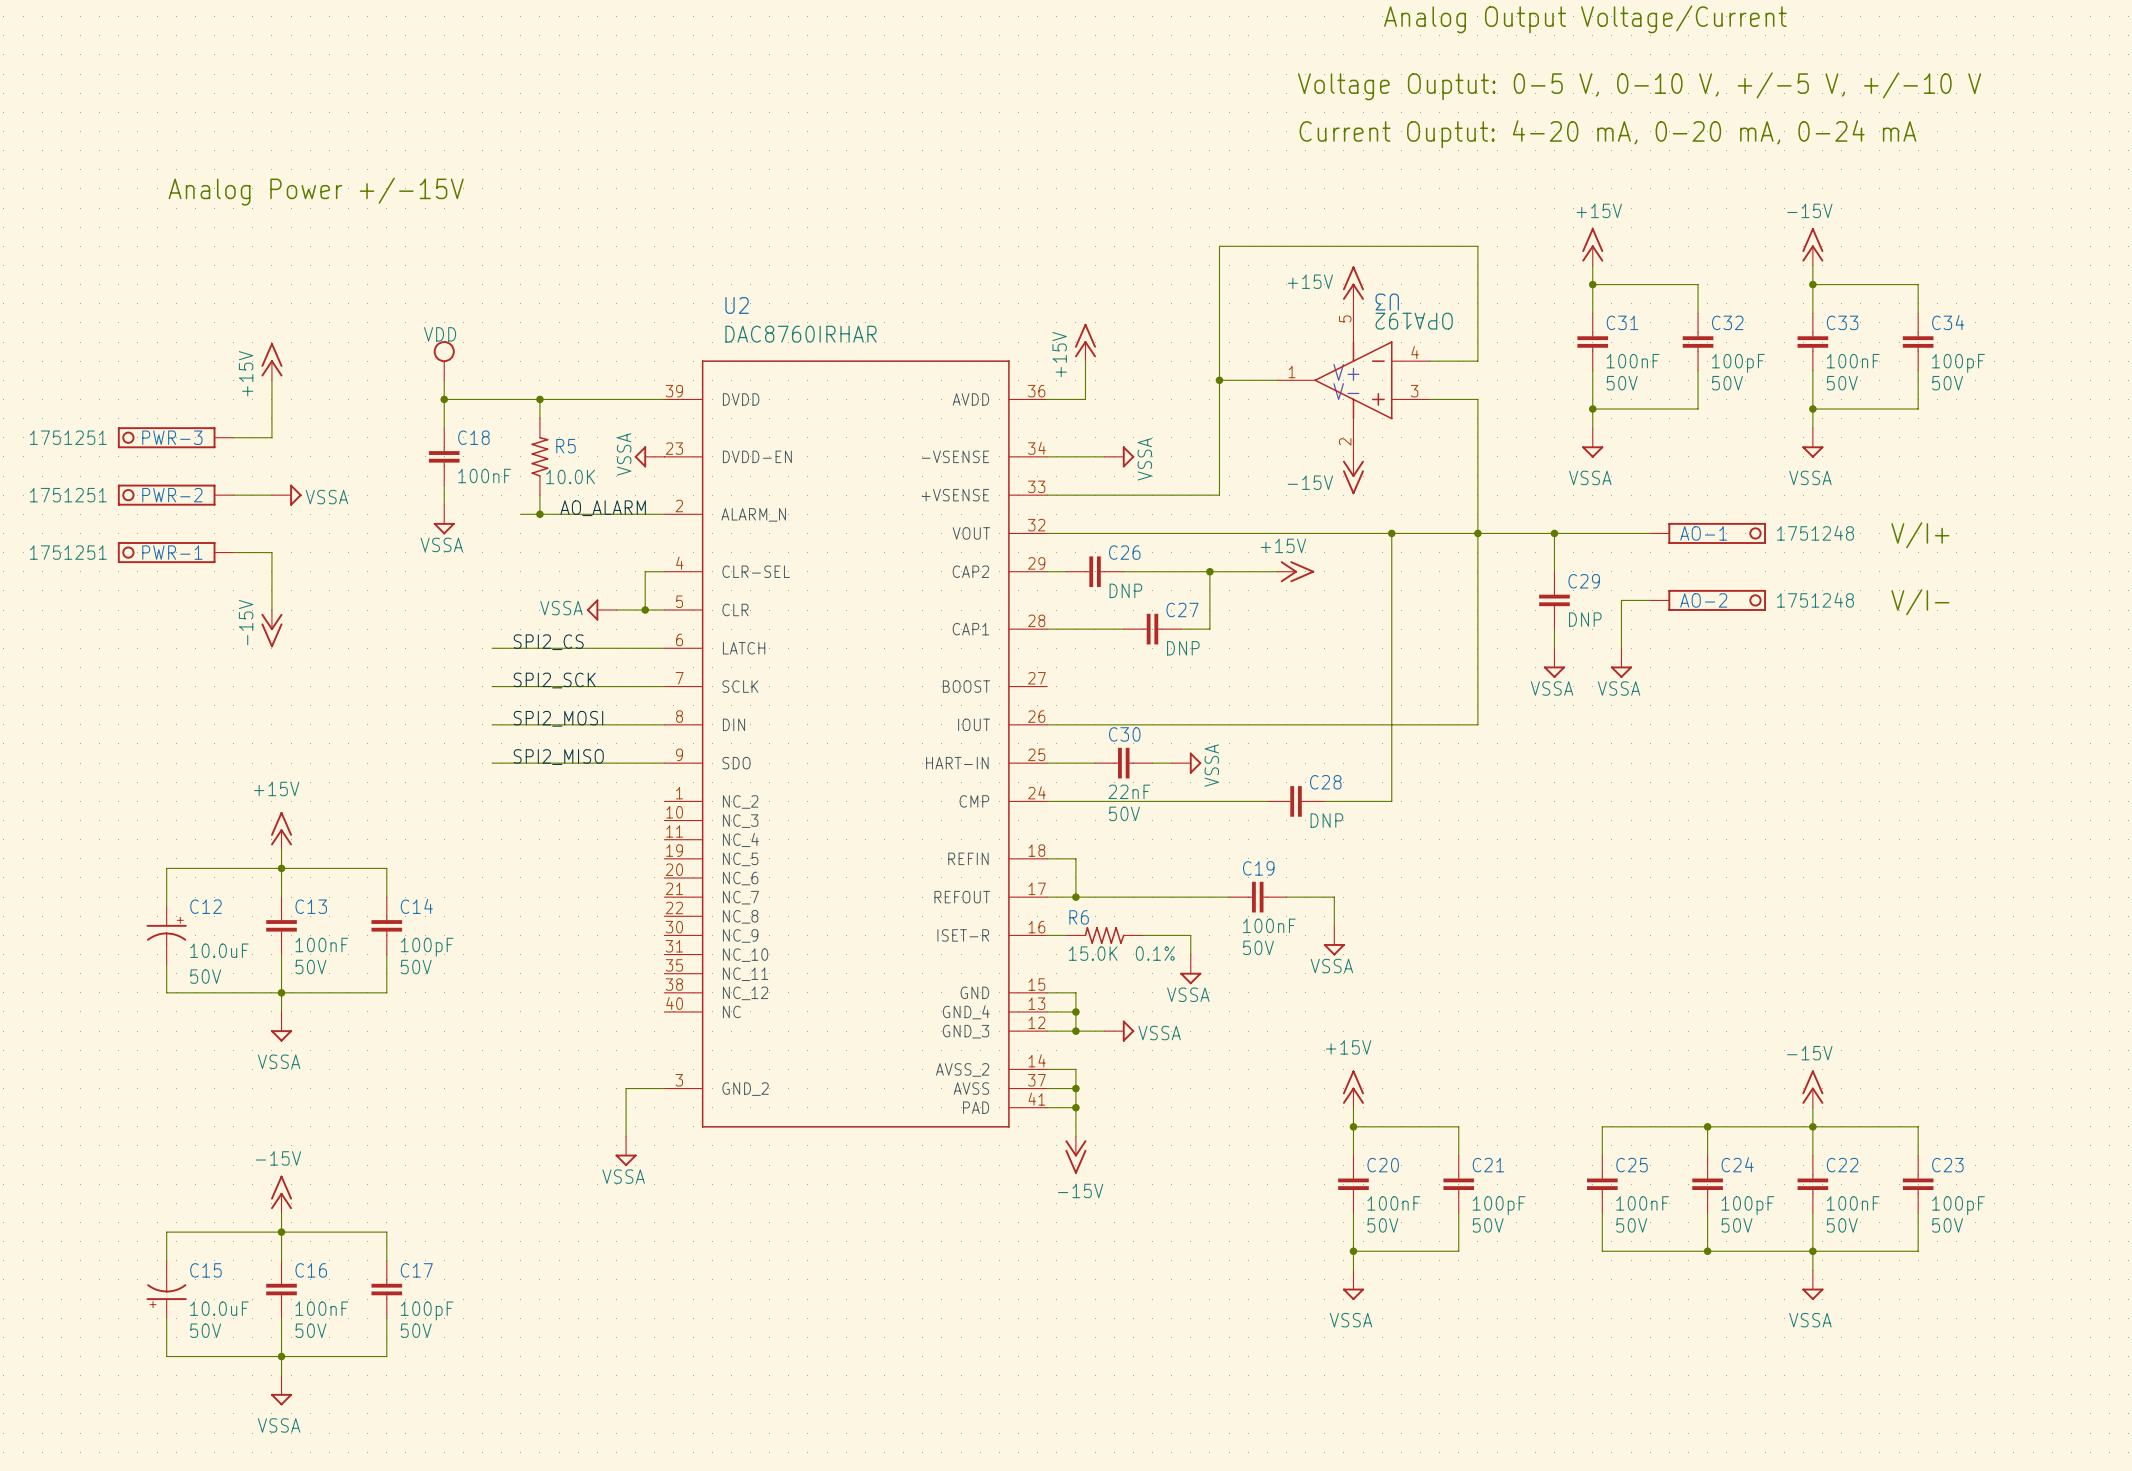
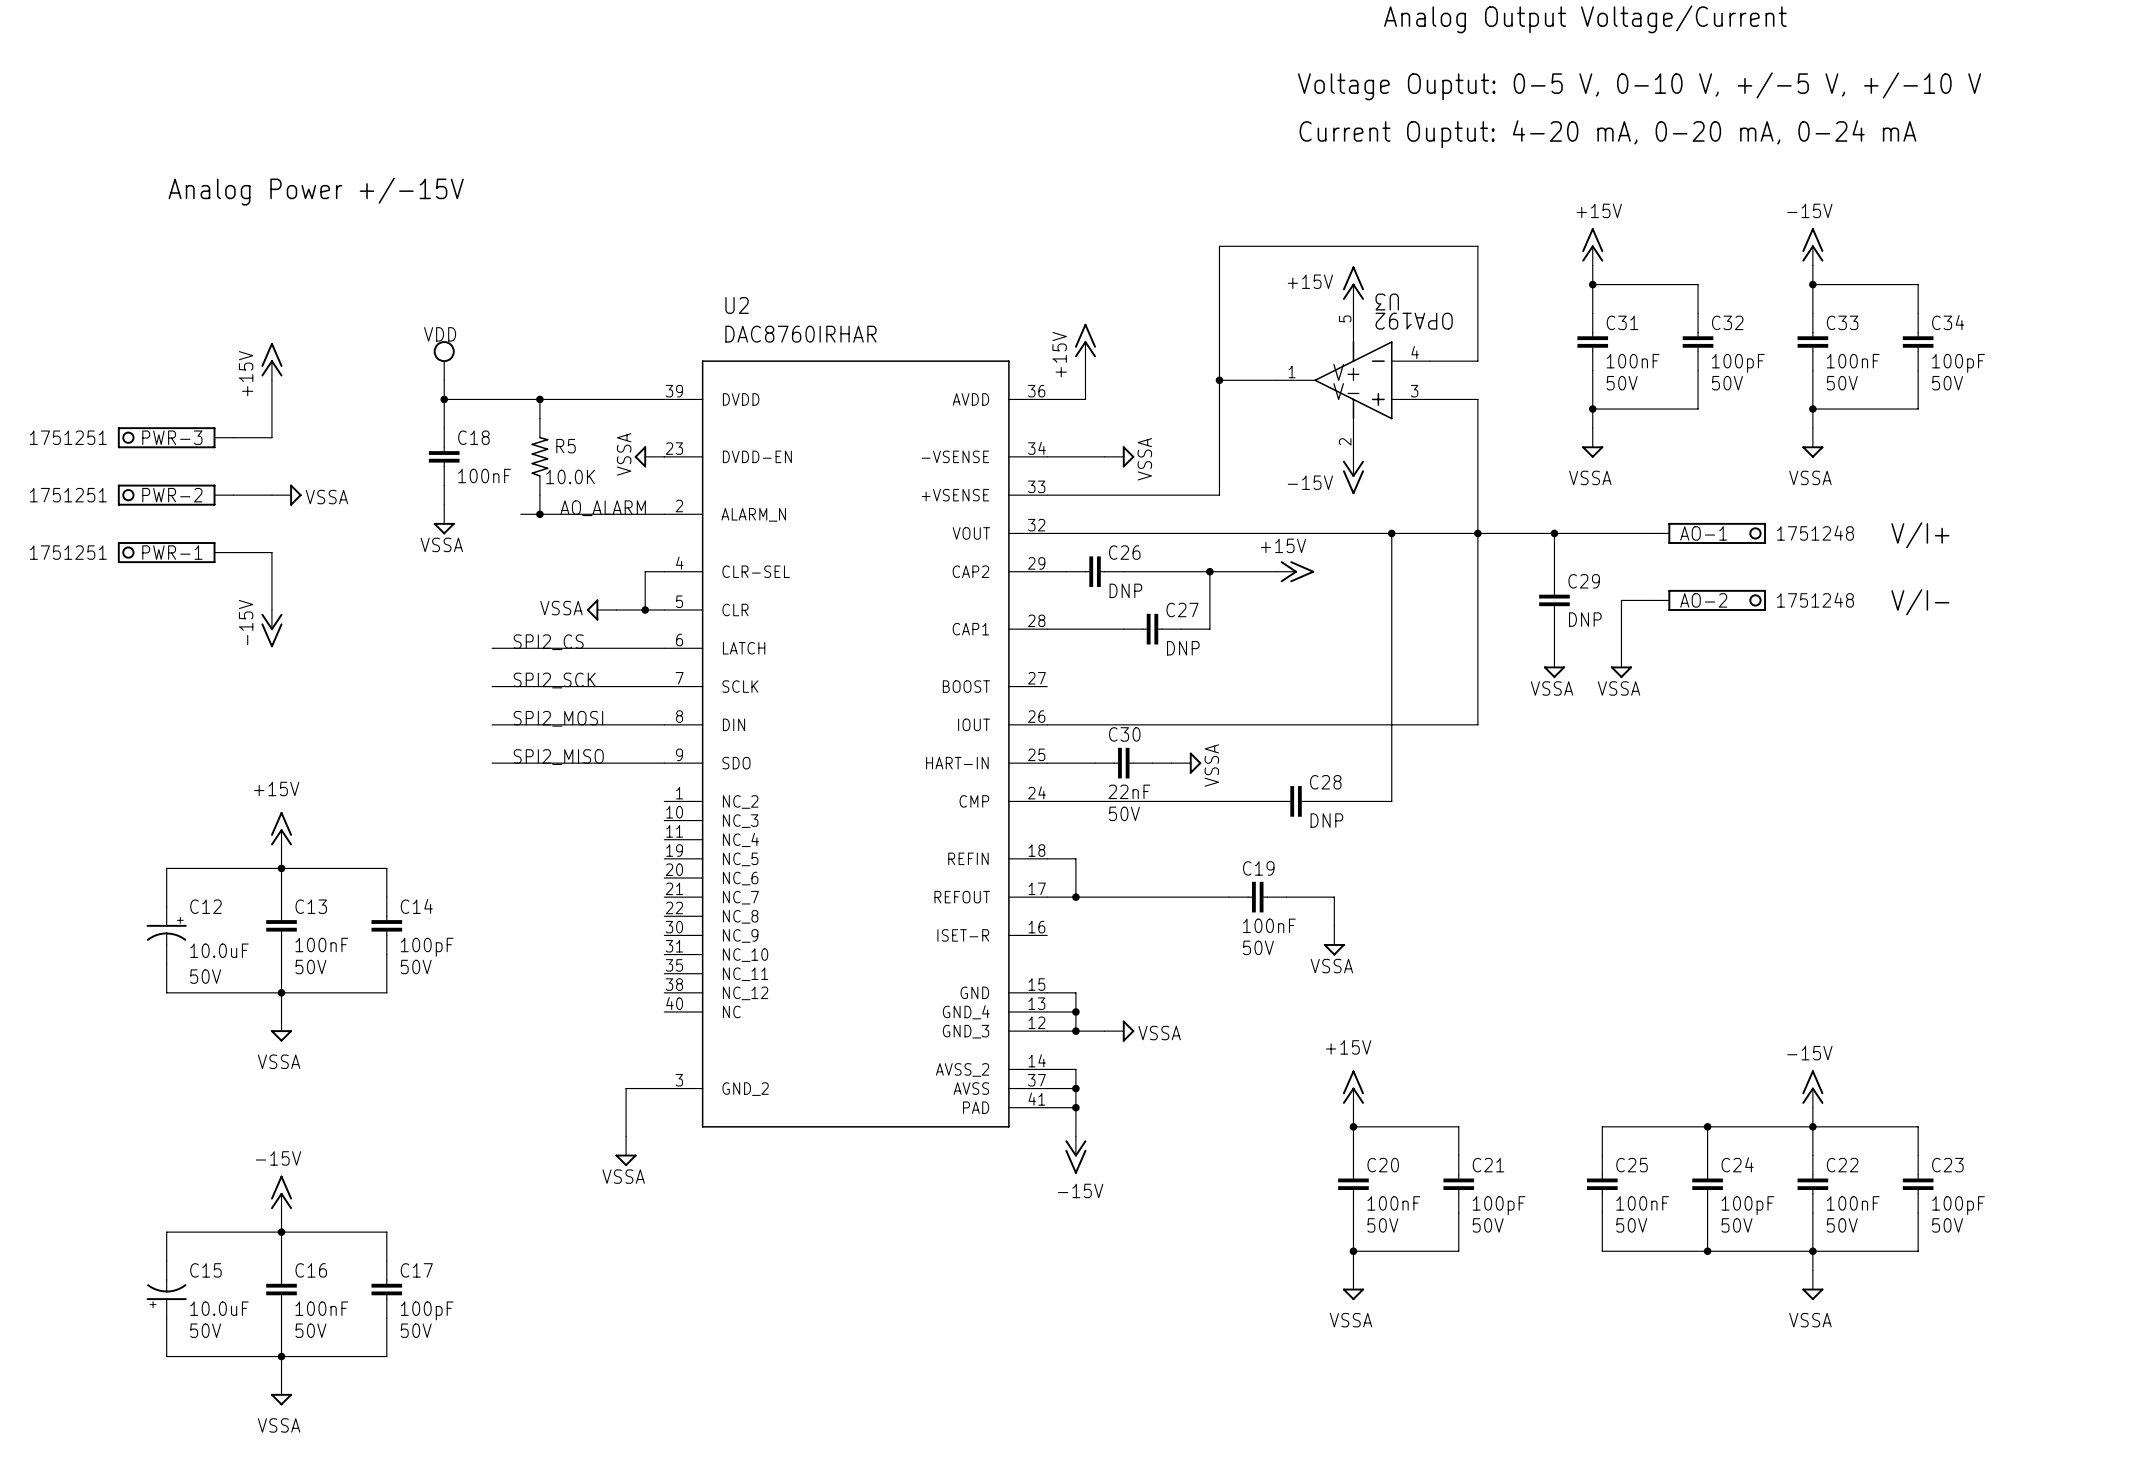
wire: (1047, 935) (1066, 935) -> none
R6: 15.0K (1104, 935) -> none
wire: (1142, 935) (1190, 935) (1190, 954) -> none
power symbol: VSSA (1190, 969) -> none

